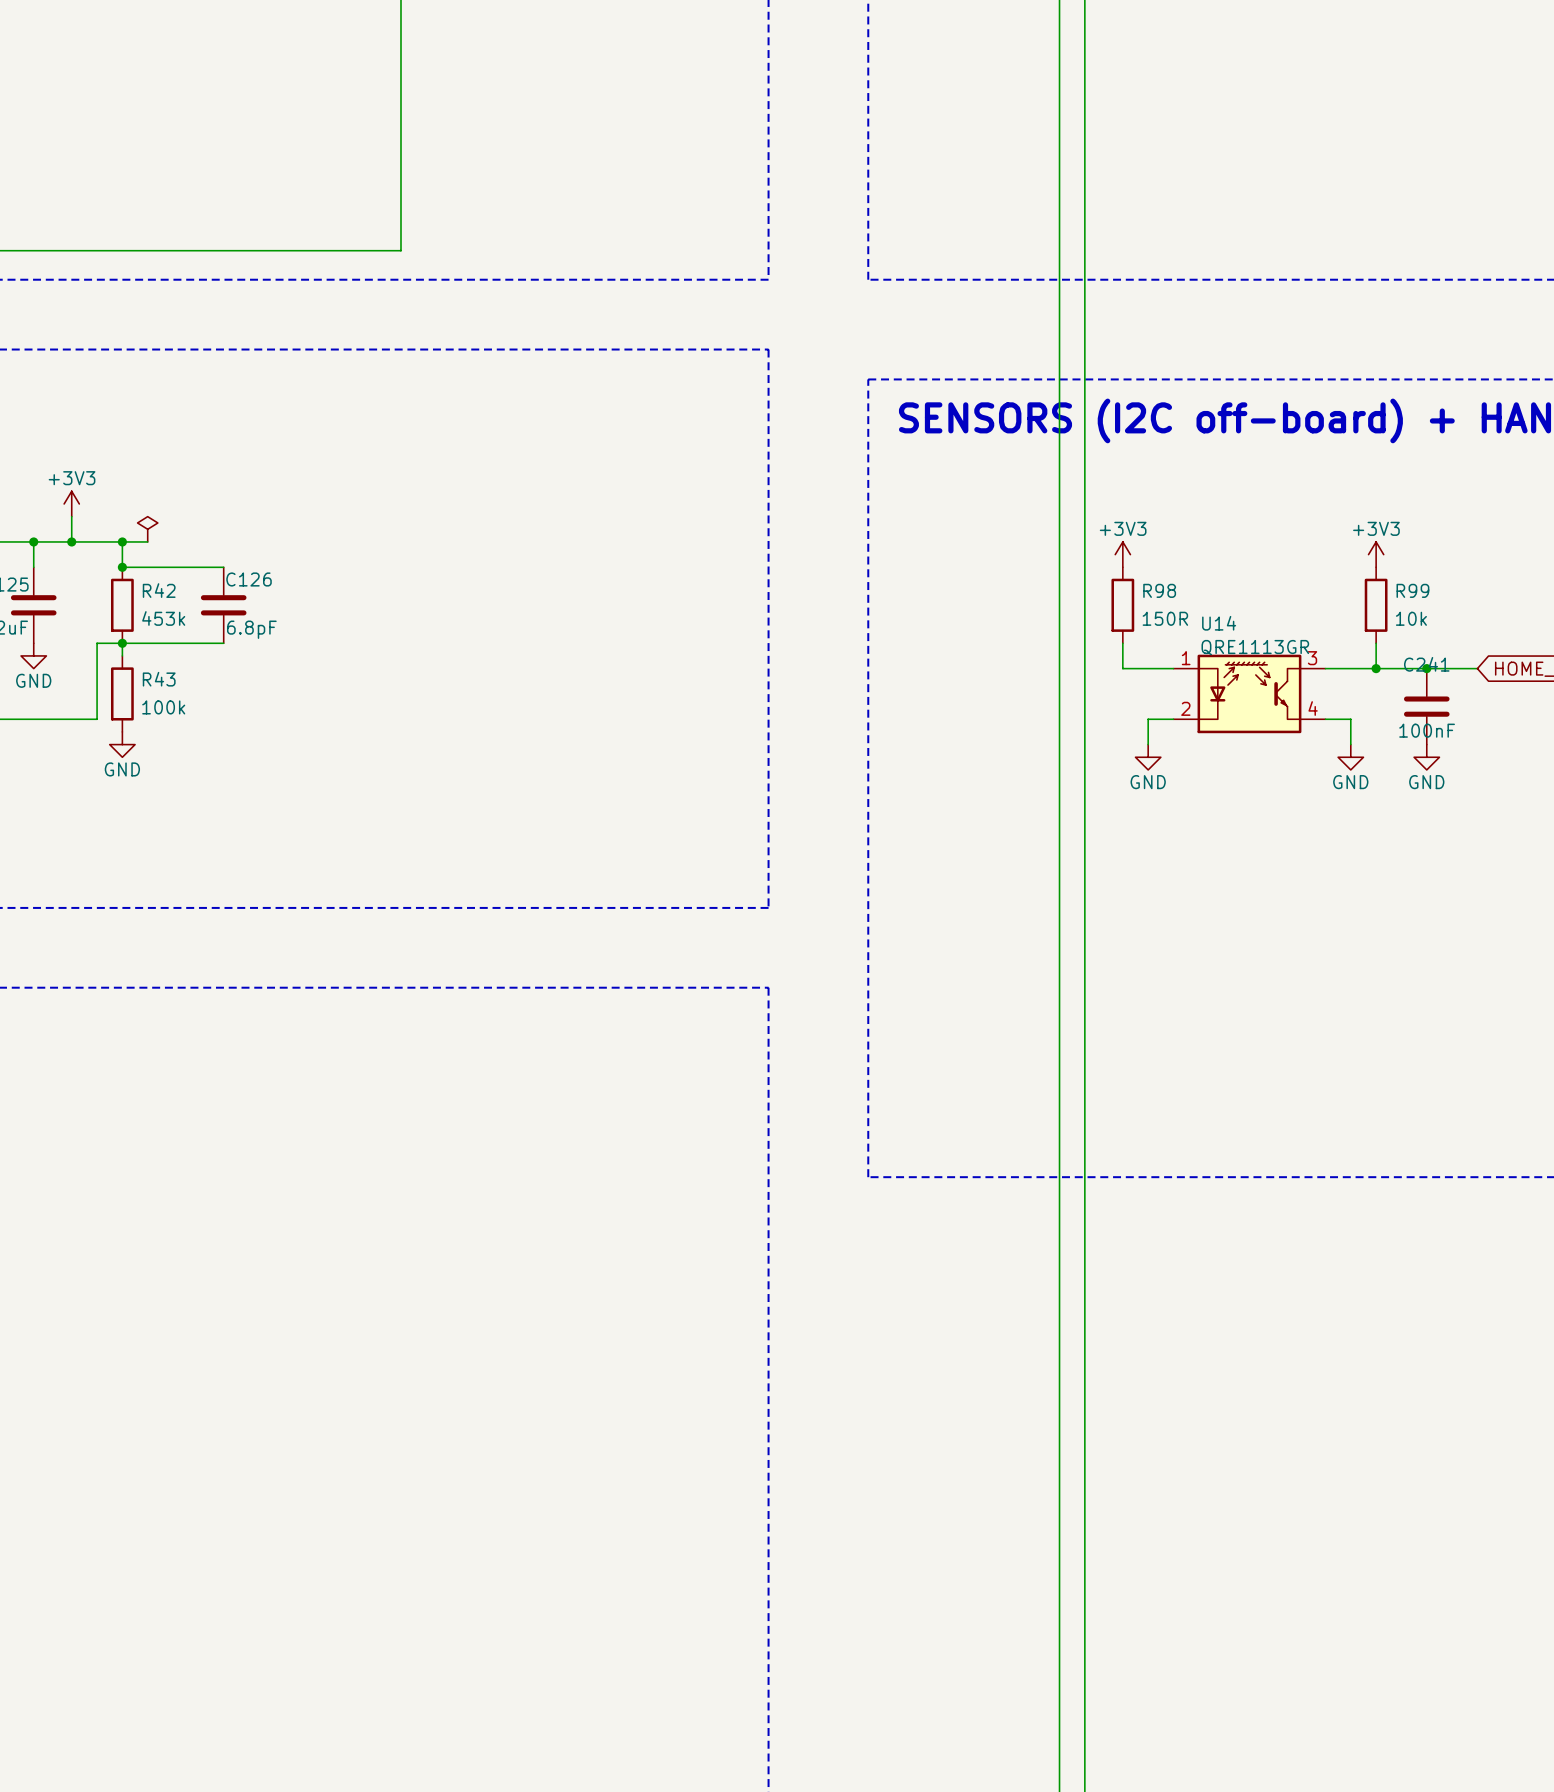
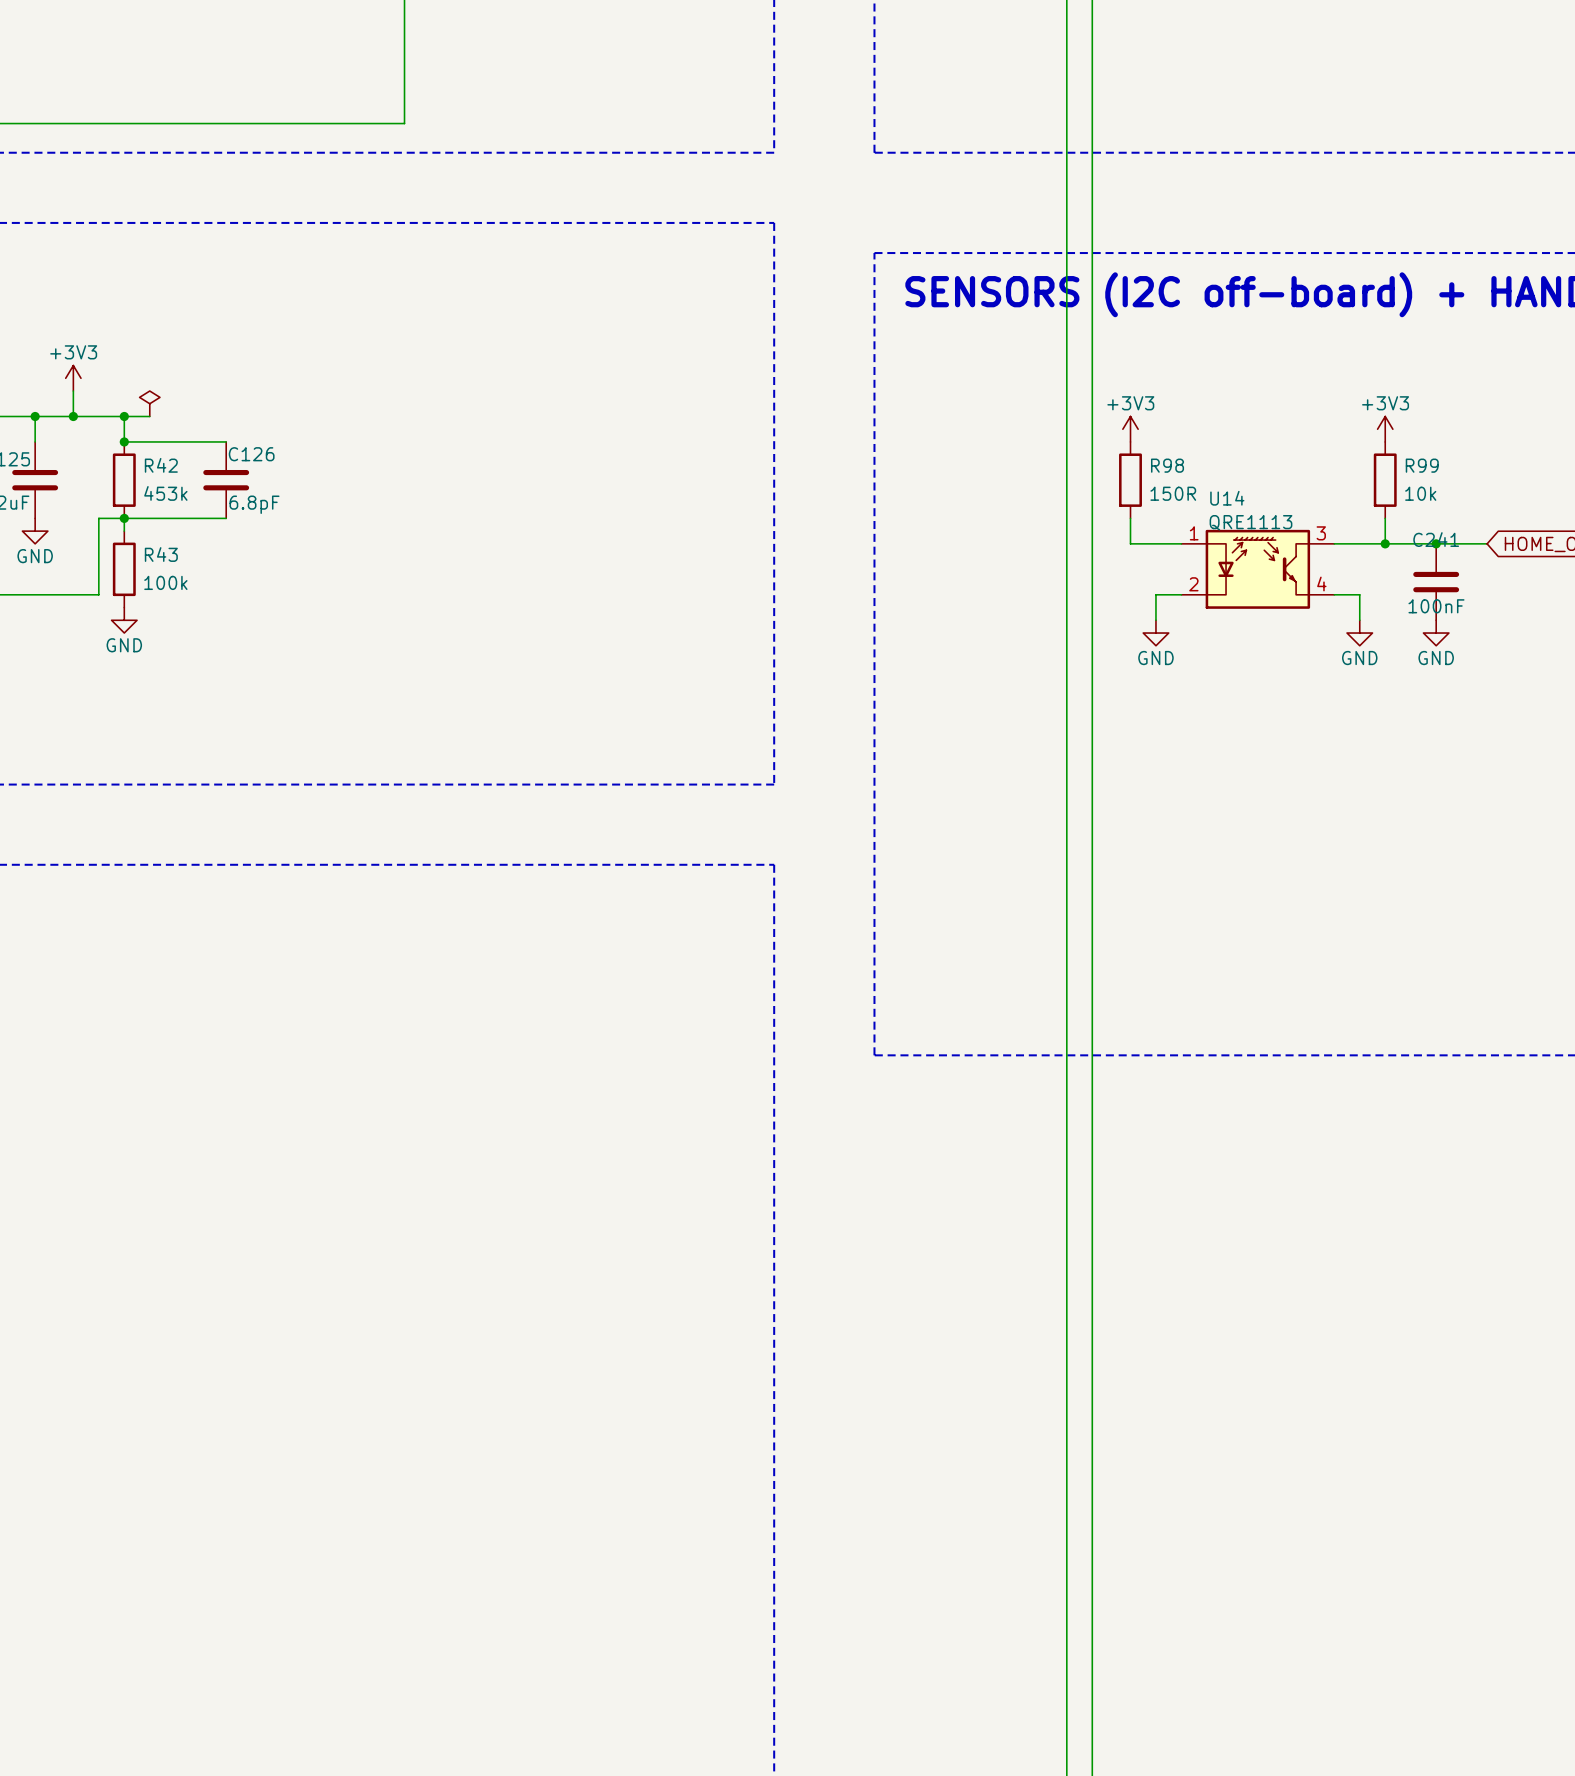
U14 value: QRE1113GR (1255, 647) -> QRE1113 (1250, 522)

